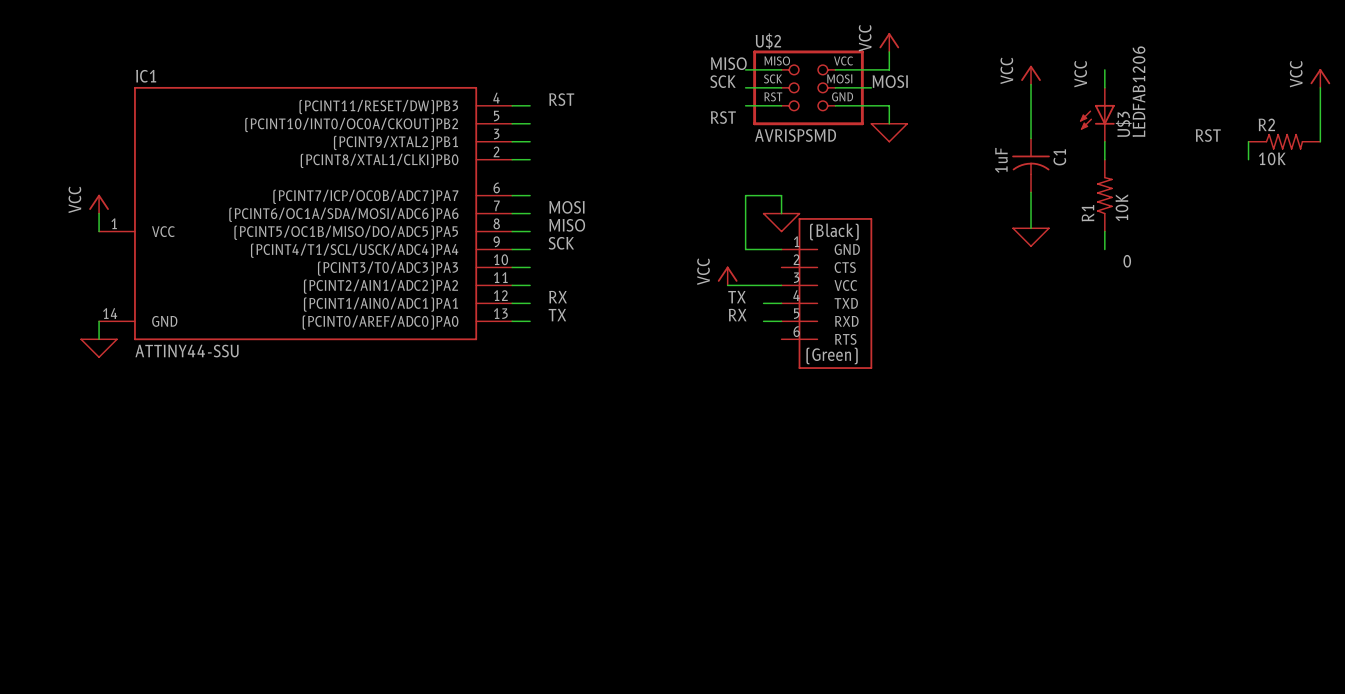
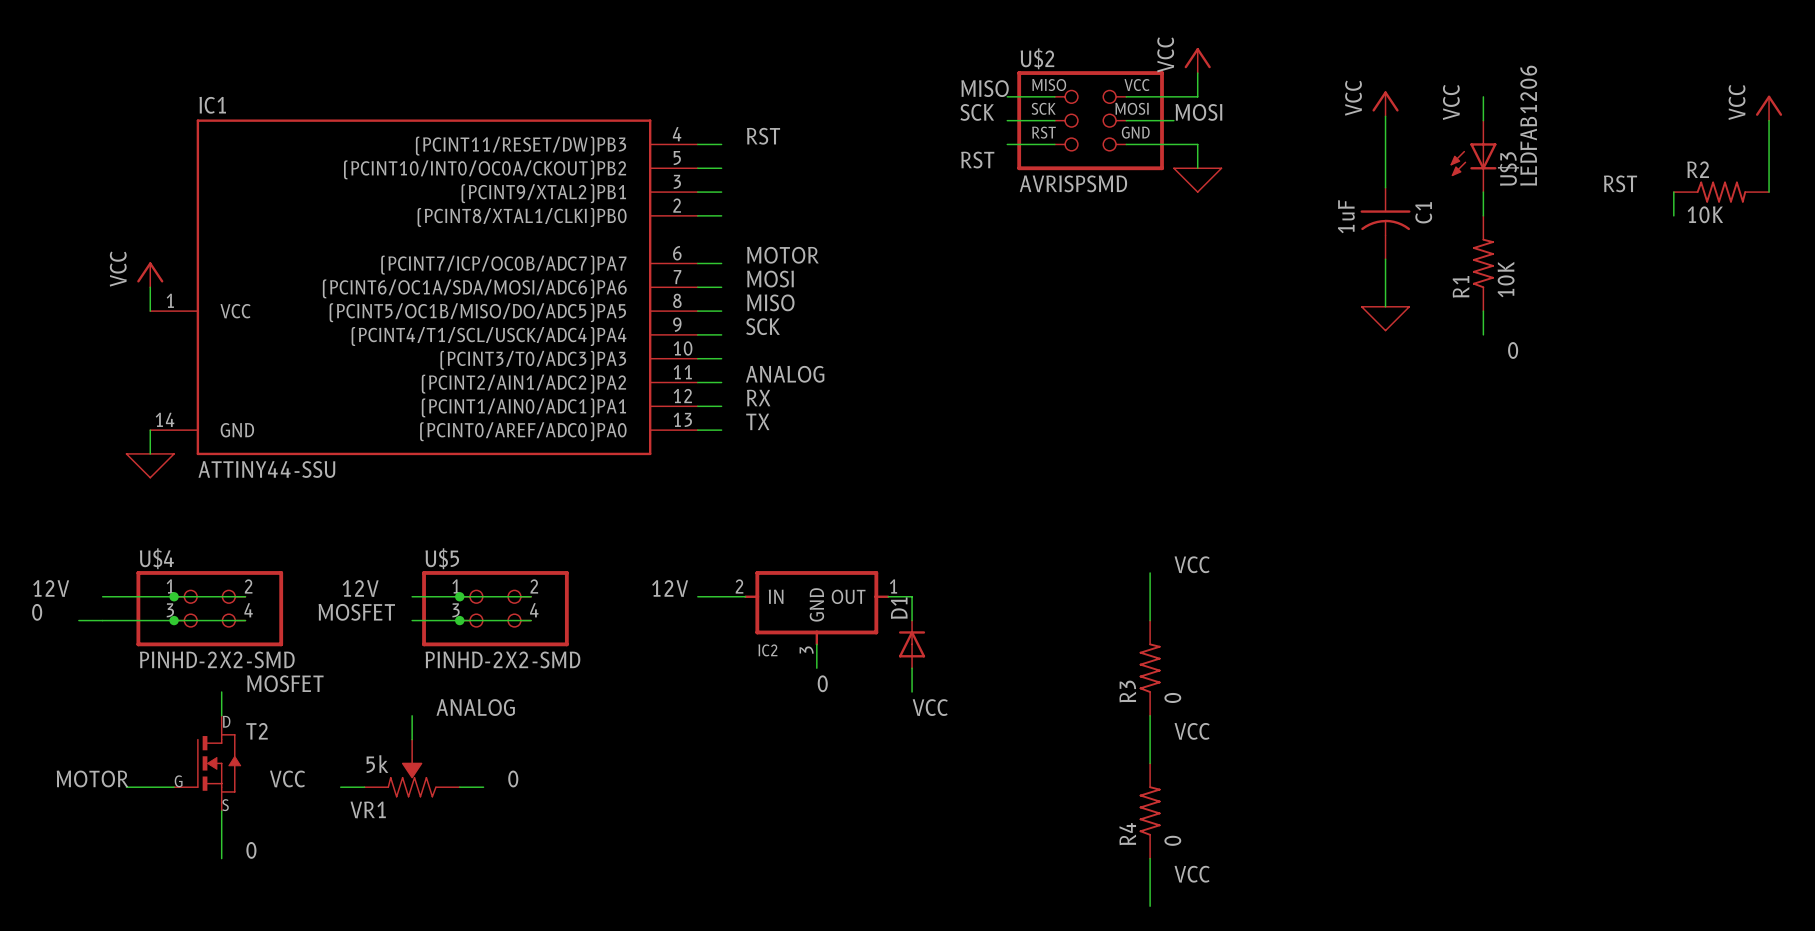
label: none -> MOTOR (782, 255)
wire: (781, 213) (781, 195) (745, 195) (745, 249) (781, 249) -> none
power symbol: (781, 222) -> none
power symbol: VCC (727, 275) -> none
label: none -> ANALOG (785, 374)
wire: (727, 285) (781, 285) -> none
part: (826, 293) -> none
label: TX (737, 297) -> none
wire: (763, 303) (781, 303) -> none
label: RX (737, 315) -> none
wire: (763, 321) (781, 321) -> none
label: none -> VCC (1192, 564)
wire: none -> (1150, 572) (1150, 620)
label: none -> 12V (51, 588)
label: none -> 12V (360, 588)
label: none -> 12V (670, 588)
wire: none -> (102, 596) (245, 596)
junction: none -> (174, 596)
wire: none -> (412, 596) (531, 596)
junction: none -> (459, 596)
wire: none -> (697, 596) (745, 596)
wire: none -> (888, 596) (912, 596) (912, 620)
IC2: none -> (816, 608)
U$4: none -> PINHD-2X2-SMD (209, 608)
U$5: none -> PINHD-2X2-SMD (495, 608)
label: none -> 0 (37, 612)
label: none -> MOSFET (356, 612)
wire: none -> (78, 620) (245, 620)
junction: none -> (174, 620)
wire: none -> (412, 620) (531, 620)
junction: none -> (459, 620)
wire: none -> (816, 644) (816, 668)
D1: none -> (912, 644)
wire: none -> (912, 668) (912, 691)
R3: none -> 0 (1150, 668)
label: none -> MOSFET (285, 683)
label: none -> 0 (822, 683)
wire: none -> (221, 691) (221, 715)
label: none -> ANALOG (475, 707)
label: none -> VCC (930, 707)
wire: none -> (412, 715) (412, 739)
wire: none -> (1150, 715) (1150, 763)
label: none -> VCC (1192, 731)
T2: none -> (207, 763)
VR1: none -> 5k (412, 768)
label: none -> MOTOR (92, 778)
label: none -> VCC (287, 778)
label: none -> 0 (513, 778)
wire: none -> (126, 787) (174, 787)
wire: none -> (340, 787) (364, 787)
wire: none -> (459, 787) (483, 787)
wire: none -> (221, 811) (221, 858)
R4: none -> 0 (1150, 811)
label: none -> 0 (251, 850)
wire: none -> (1150, 858) (1150, 906)
label: none -> VCC (1192, 874)

